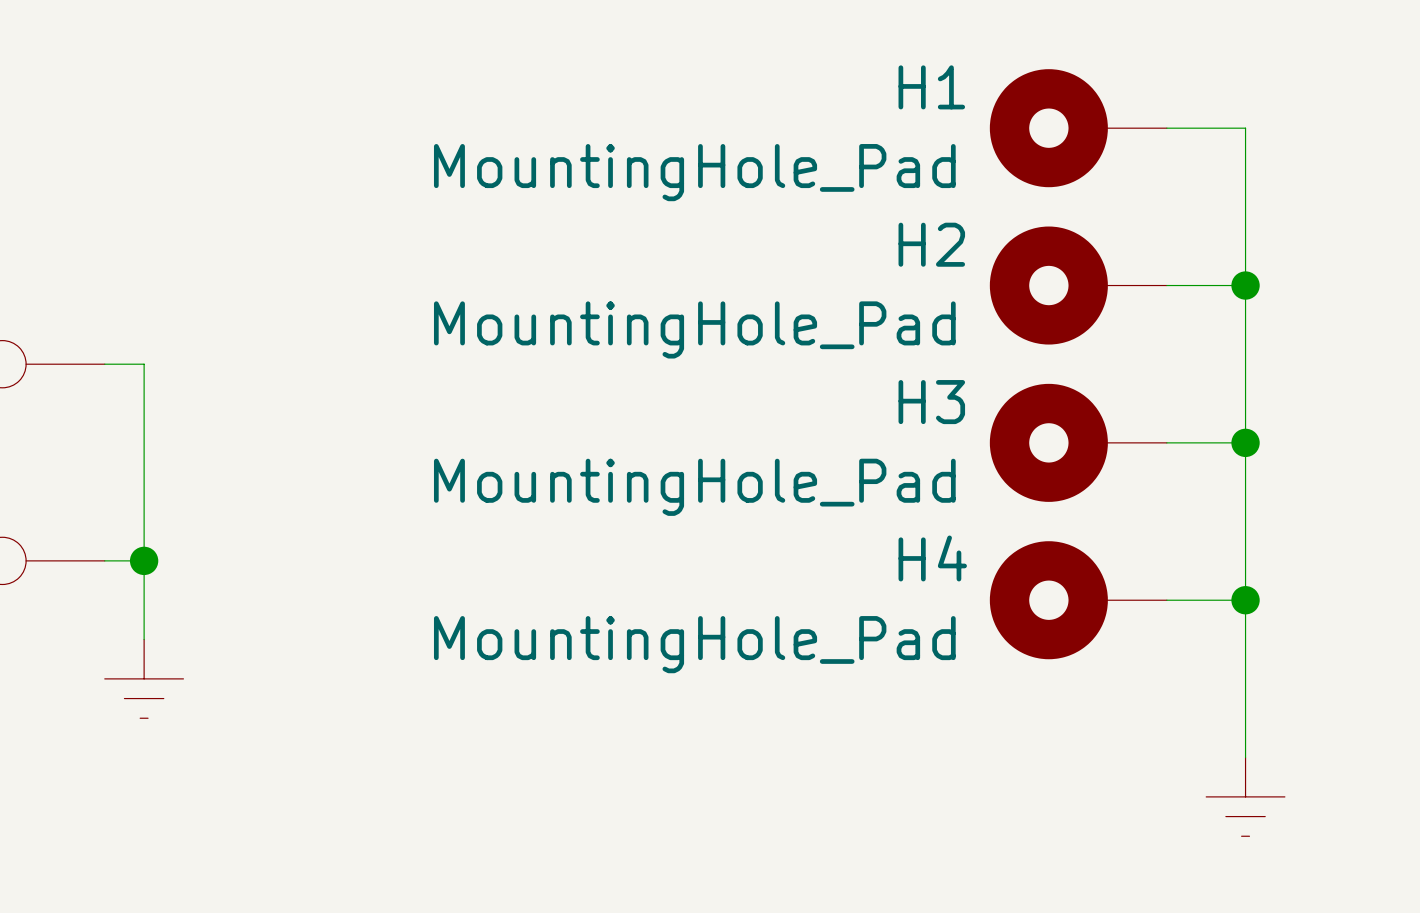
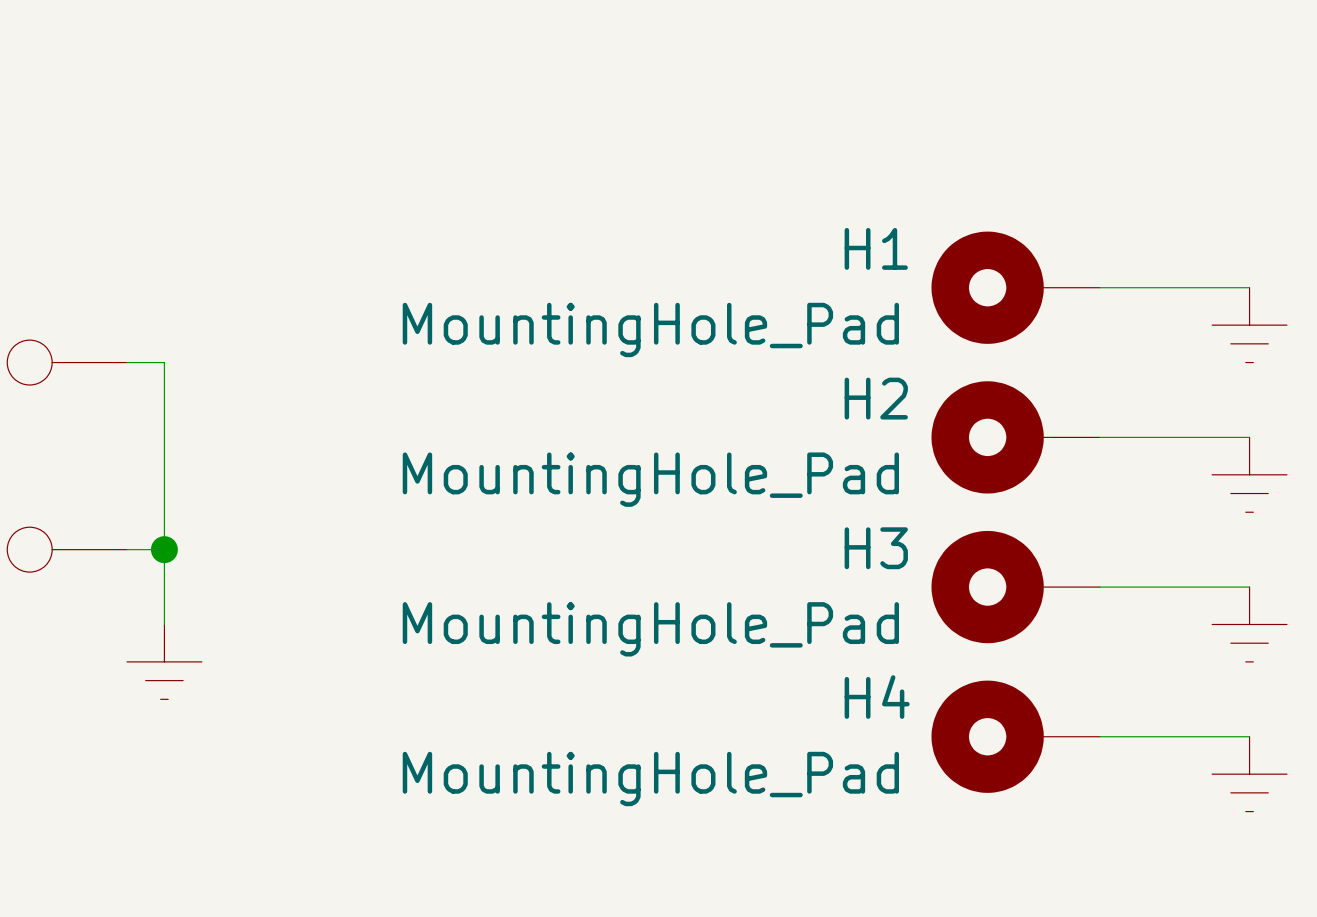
H1 position: (1078, 128) -> (1015, 287)
wire: (1166, 128) (1245, 128) (1245, 757) -> none
H2 position: (1078, 285) -> (1015, 437)
wire: none -> (1212, 287) (1249, 287)
junction: (1245, 285) -> none
power symbol: none -> (1249, 325)
H3 position: (1078, 442) -> (1015, 587)
wire: none -> (1212, 437) (1249, 437)
junction: (1245, 442) -> none
power symbol: none -> (1249, 474)
H4 position: (1078, 600) -> (1015, 736)
wire: none -> (1212, 587) (1249, 587)
junction: (1245, 600) -> none
power symbol: none -> (1249, 624)
wire: none -> (1099, 736) (1249, 736)
power symbol position: (1245, 796) -> (1249, 774)

